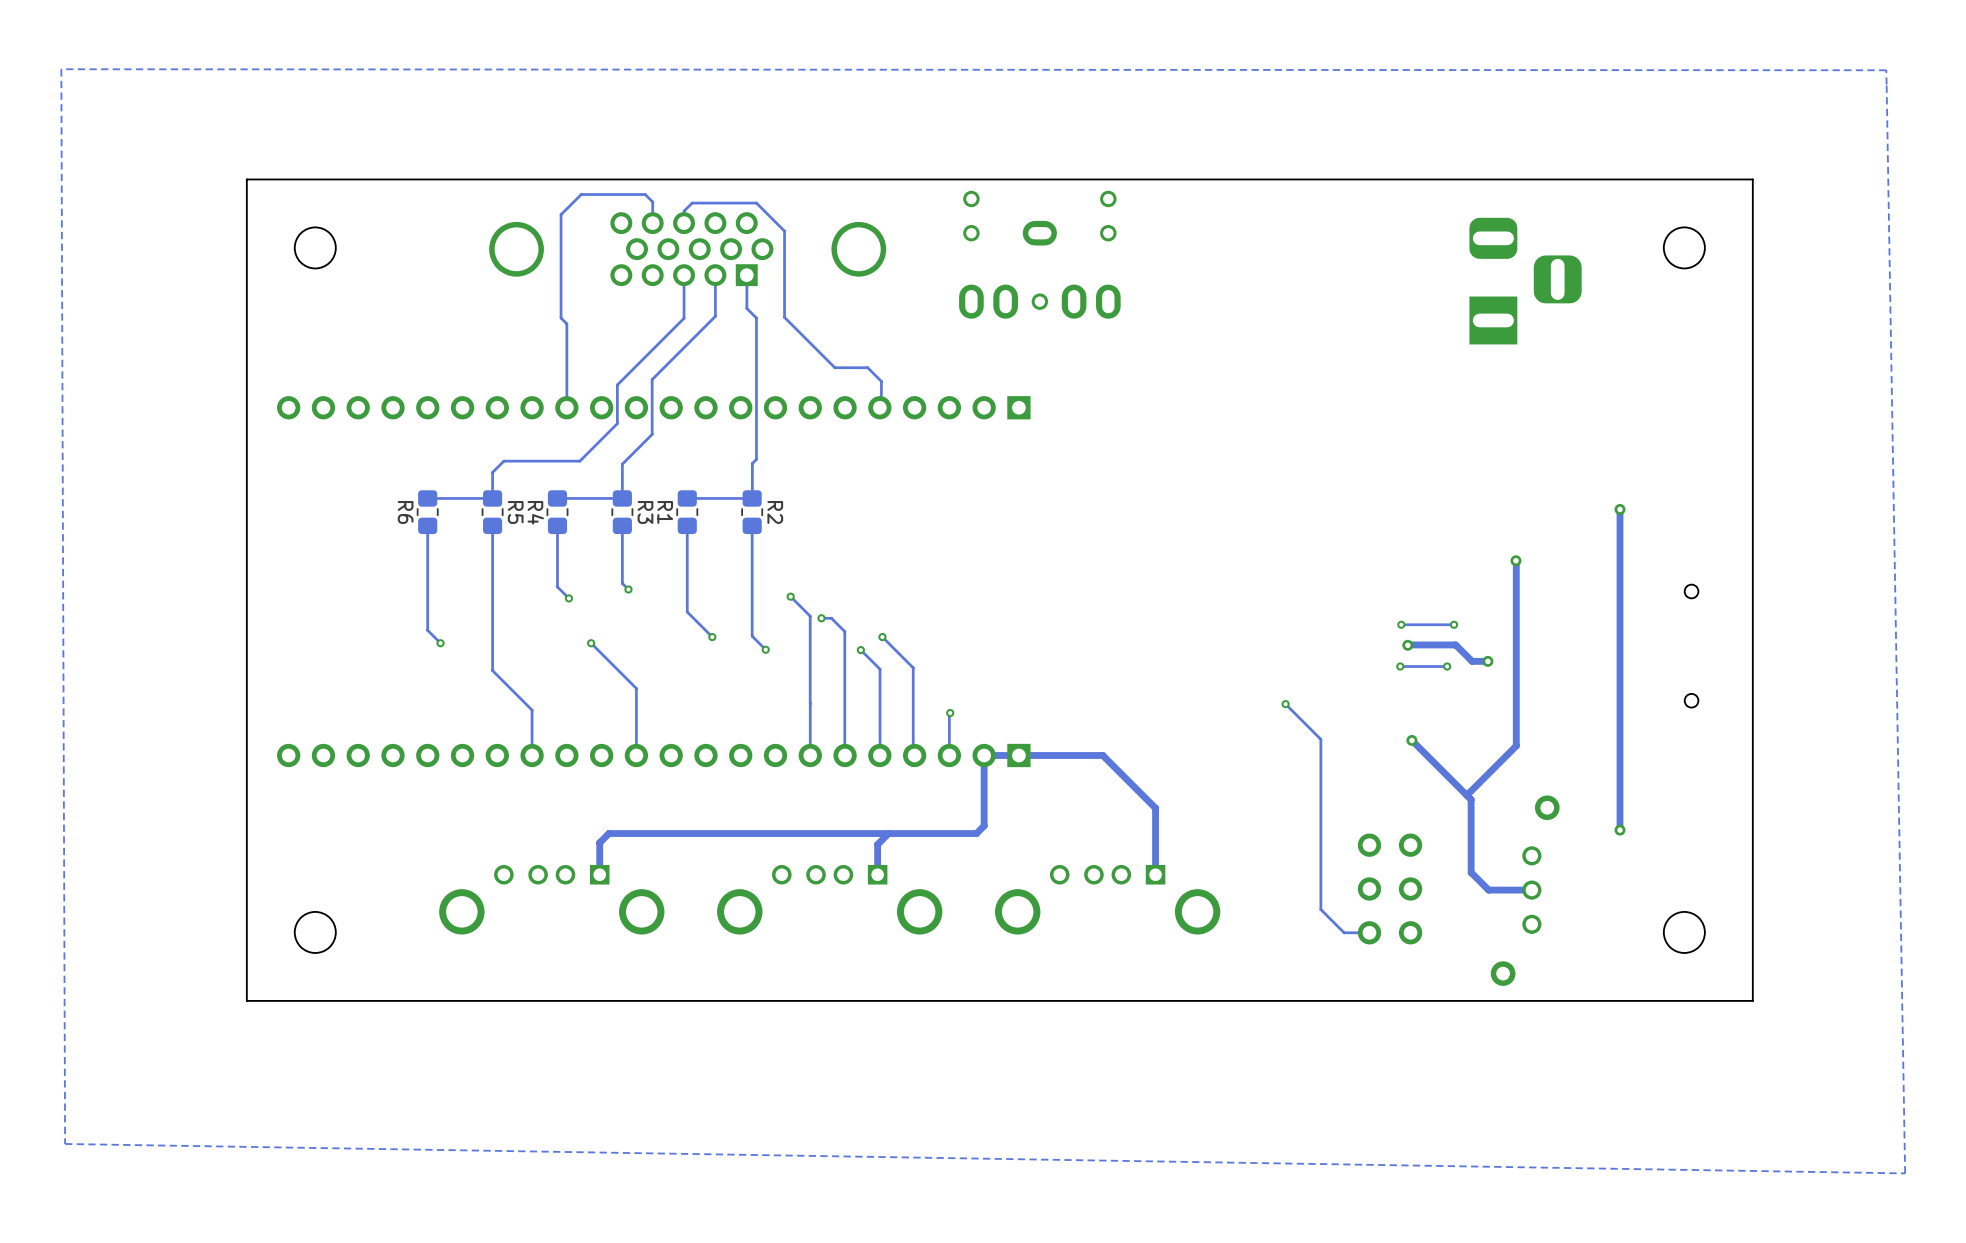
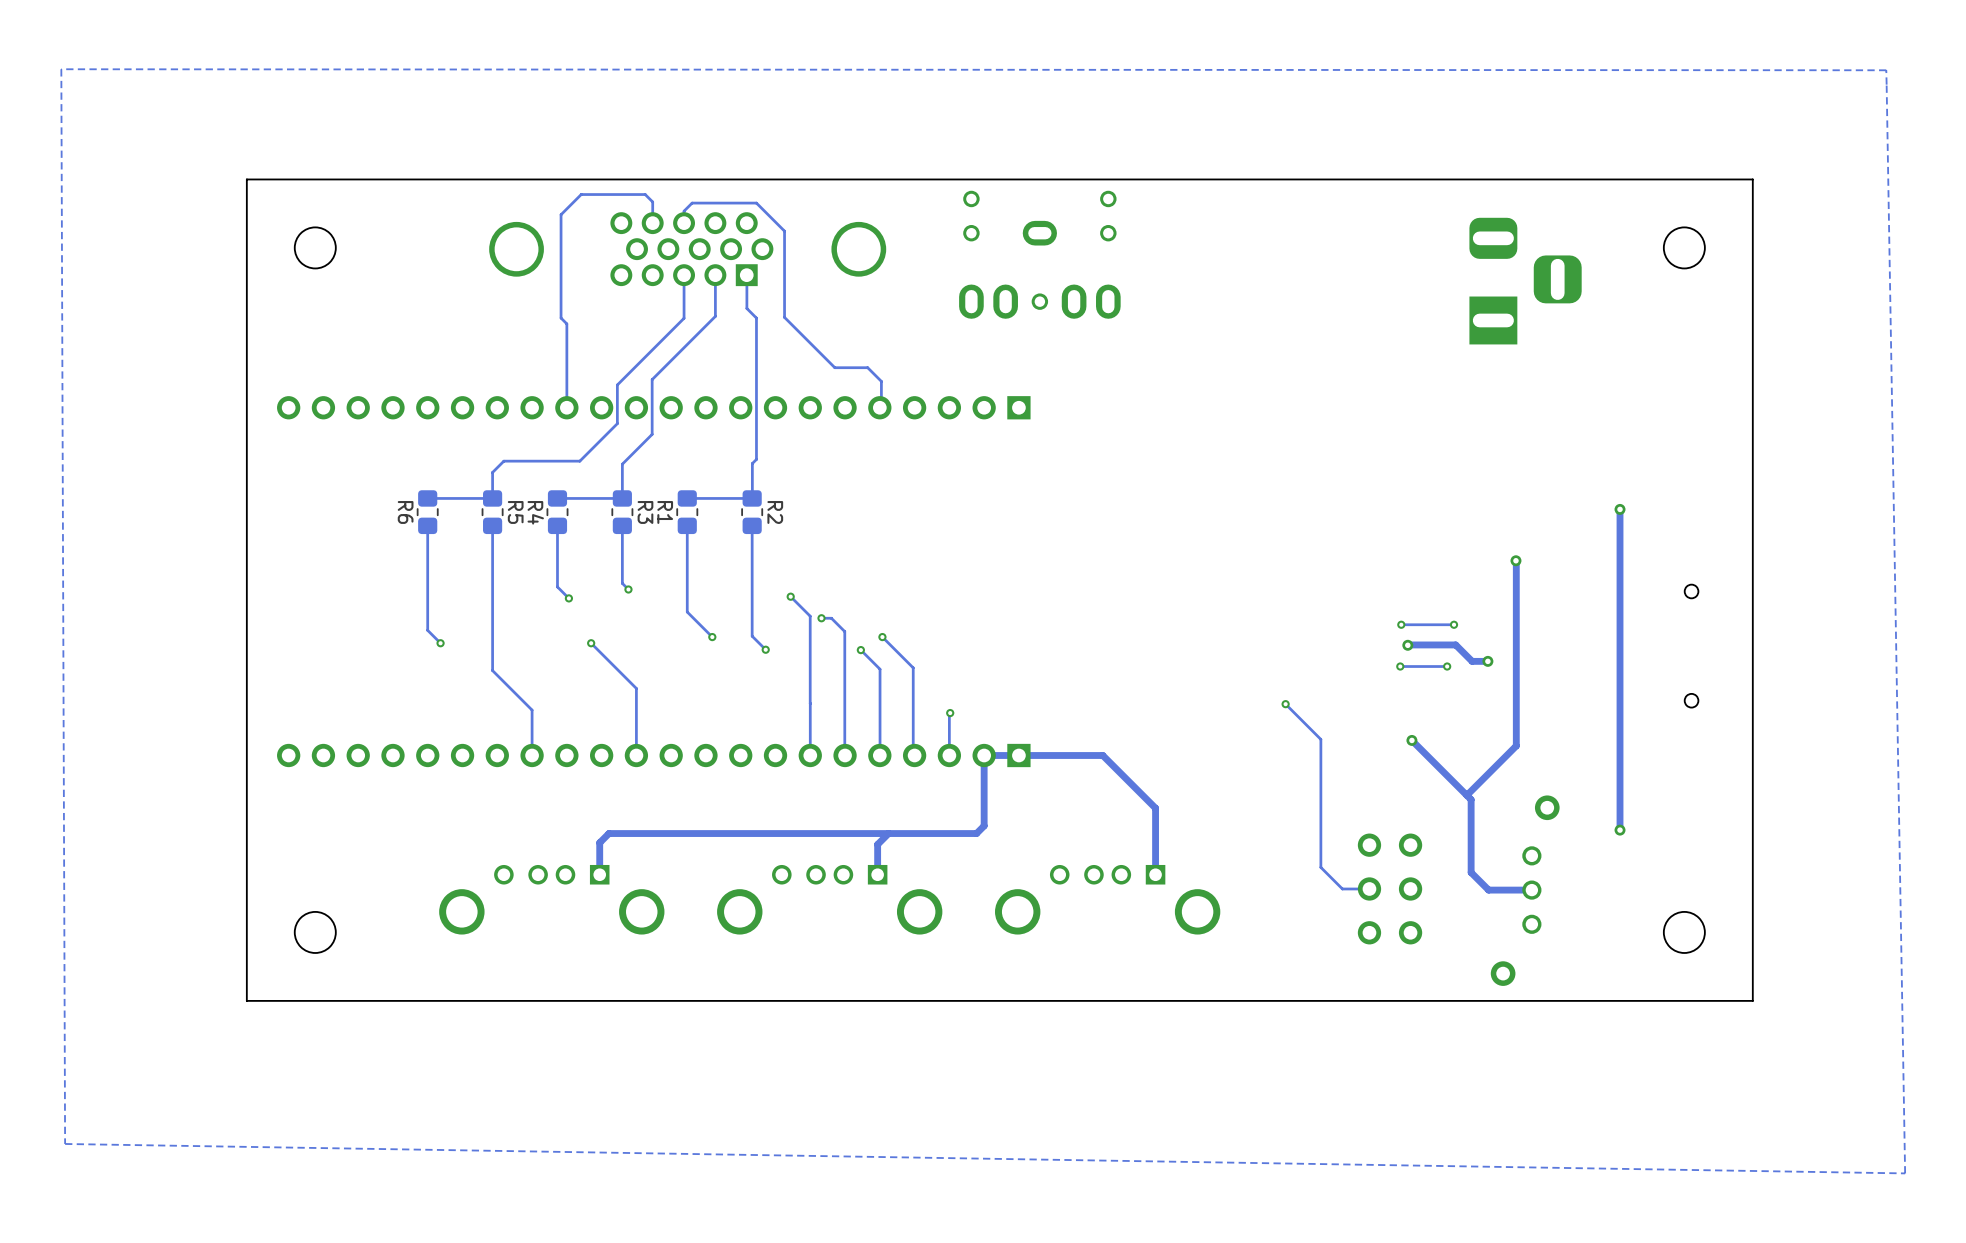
track: (1320, 867) (1320, 909) (1344, 932) (1369, 932) -> (1320, 867) (1342, 888) (1369, 888)

